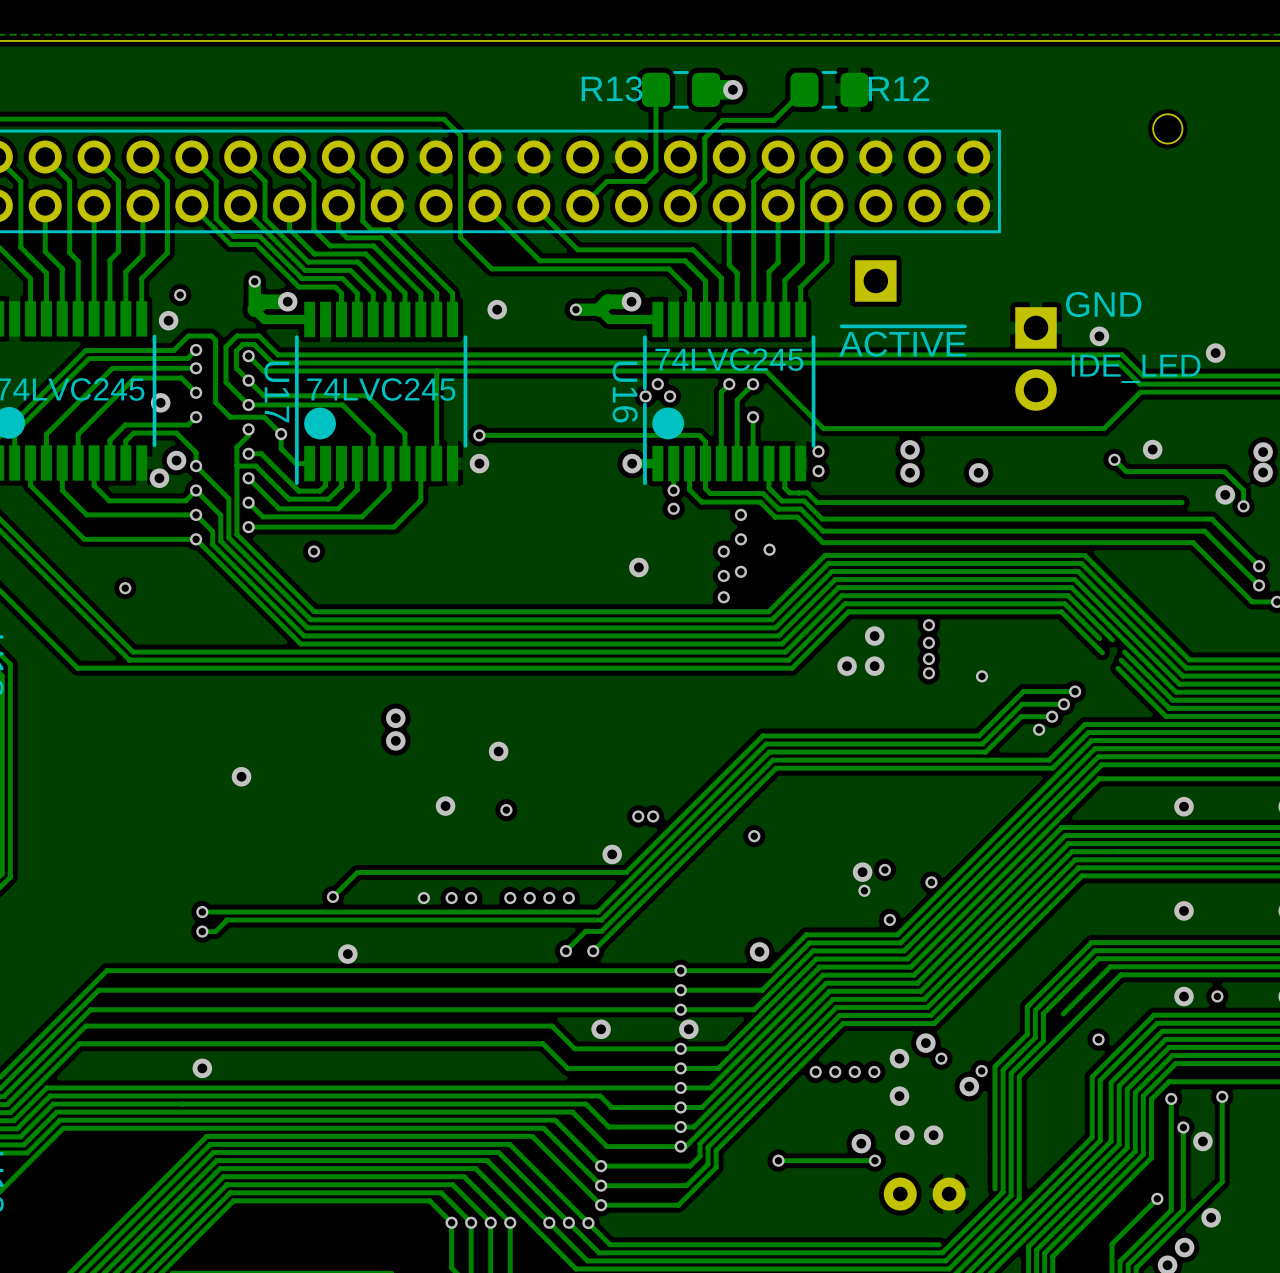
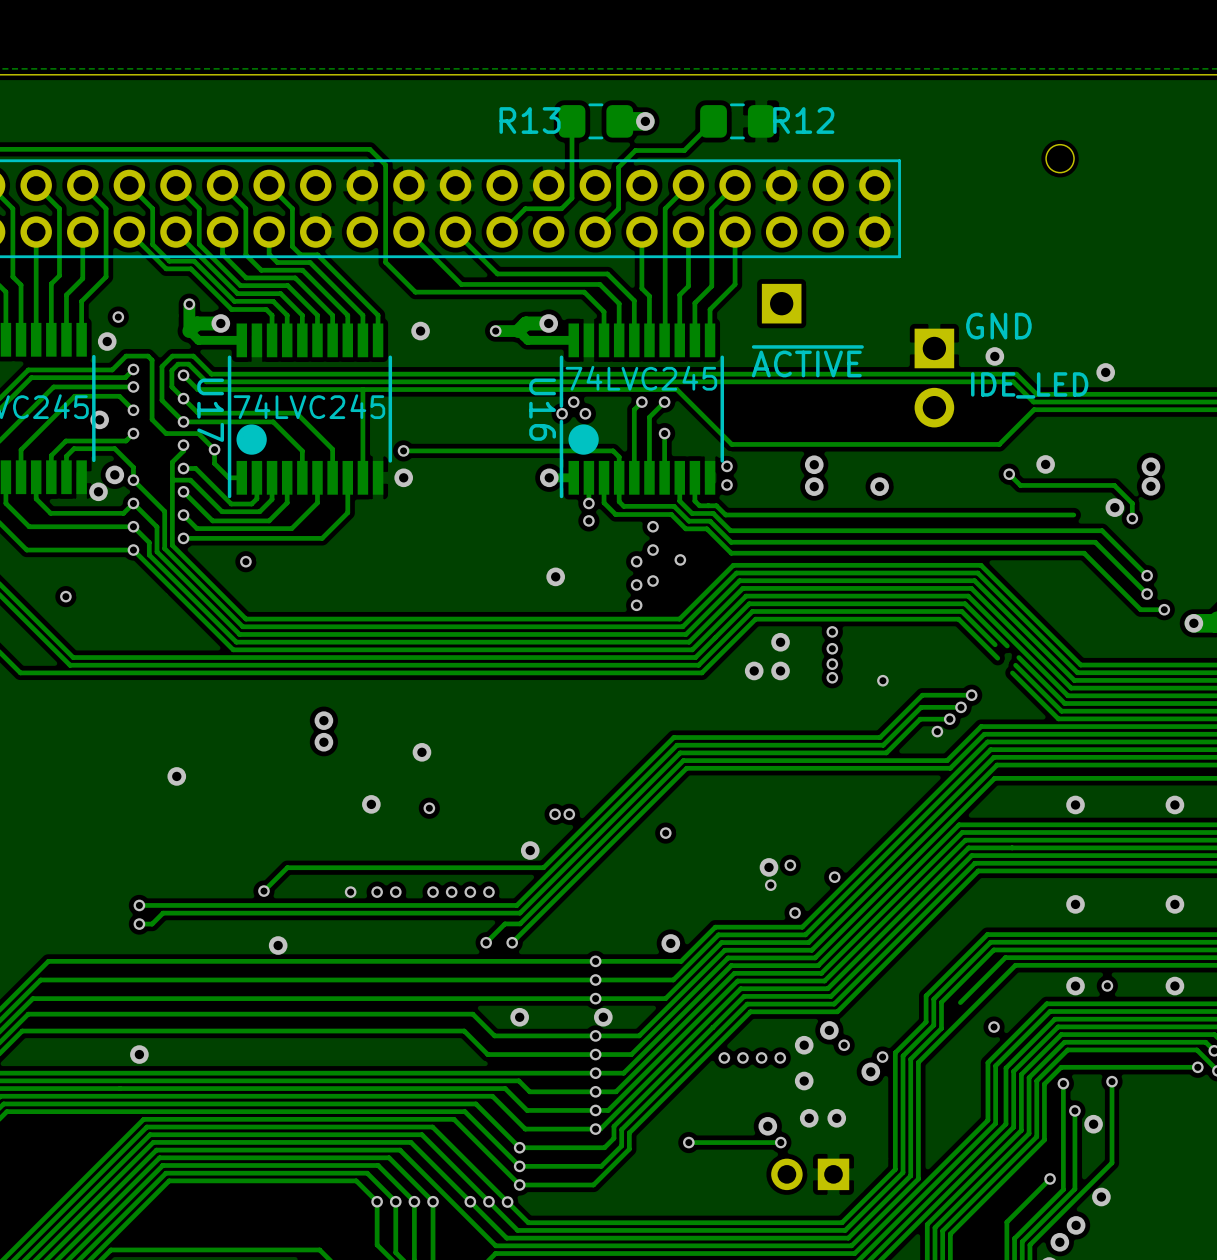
part footprint: [883, 1177, 966, 1211] -> [771, 1158, 850, 1191]
track: none -> (895, 1169) (842, 1222)

